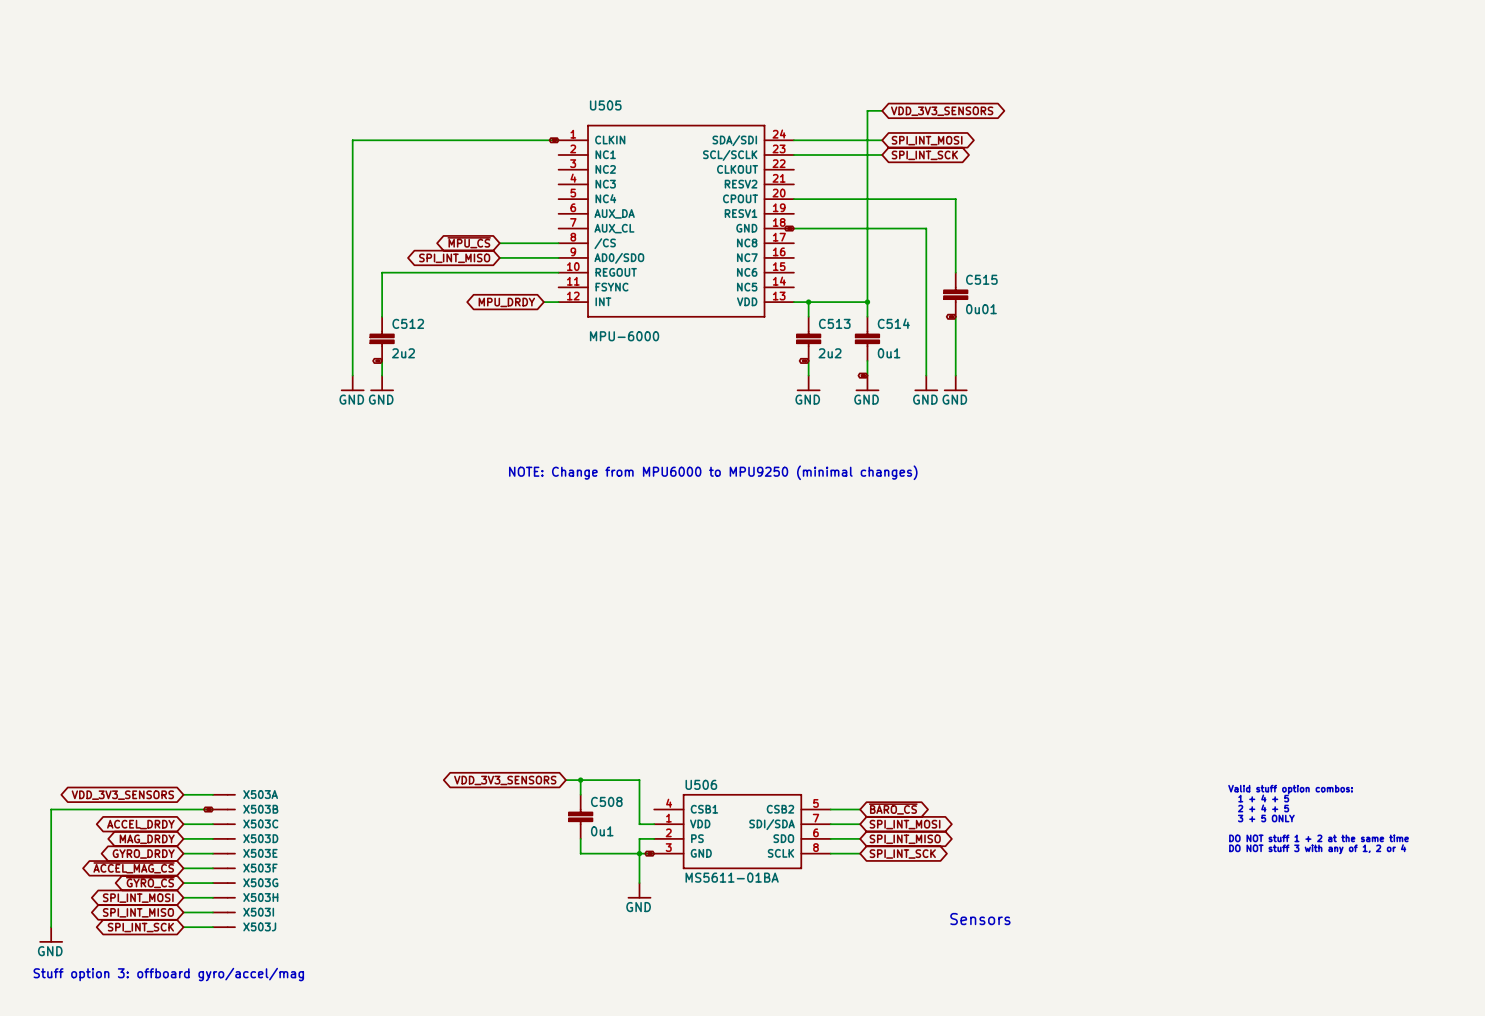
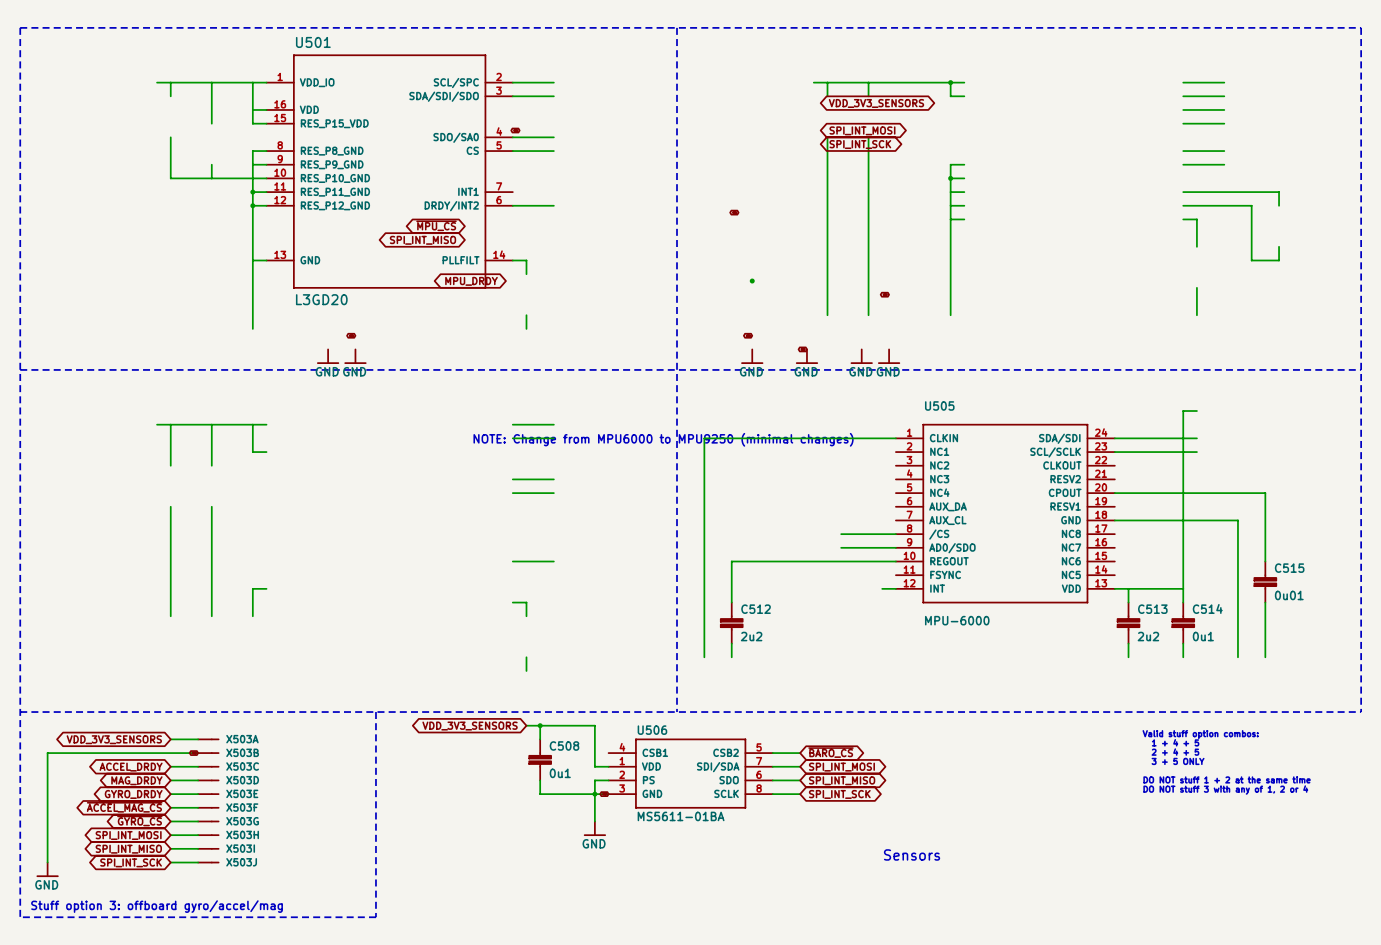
line: none -> (676, 27) (676, 712)
wire: none -> (157, 82) (266, 82)
wire: none -> (170, 82) (170, 96)
wire: none -> (211, 82) (211, 123)
wire: none -> (252, 82) (252, 123) (266, 123)
wire: none -> (512, 82) (553, 82)
wire: none -> (813, 82) (964, 82)
wire: none -> (827, 82) (827, 96)
wire: none -> (868, 82) (868, 96)
wire: none -> (950, 82) (950, 96) (964, 96)
junction: none -> (950, 82)
wire: none -> (1183, 82) (1224, 82)
wire: none -> (512, 96) (553, 96)
wire: none -> (1183, 96) (1224, 96)
wire: (882, 110) (867, 110) (867, 316) -> none
wire: none -> (252, 109) (266, 109)
wire: none -> (1183, 109) (1224, 109)
wire: none -> (1183, 123) (1224, 123)
wire: (558, 140) (352, 140) (352, 375) -> none
wire: (793, 140) (882, 140) -> none
wire: none -> (170, 137) (170, 178) (266, 178)
wire: none -> (512, 137) (553, 137)
wire: none -> (827, 137) (827, 315)
wire: none -> (868, 137) (868, 315)
wire: (793, 155) (882, 155) -> none
wire: none -> (266, 151) (252, 151) (252, 328)
wire: none -> (512, 151) (553, 151)
wire: none -> (1183, 151) (1224, 151)
wire: none -> (211, 164) (211, 178)
wire: none -> (252, 164) (266, 164)
wire: none -> (964, 164) (950, 164) (950, 315)
wire: none -> (1183, 164) (1224, 164)
U501: none -> L3GD20 (389, 171)
wire: none -> (950, 178) (964, 178)
junction: none -> (950, 178)
wire: (793, 199) (955, 199) (955, 272) -> none
wire: none -> (252, 192) (266, 192)
junction: none -> (252, 192)
wire: none -> (950, 192) (964, 192)
wire: none -> (1183, 192) (1279, 192) (1279, 205)
wire: none -> (252, 205) (266, 205)
junction: none -> (252, 205)
wire: none -> (512, 205) (553, 205)
U505 position: (676, 221) -> (1005, 513)
wire: none -> (950, 205) (964, 205)
wire: none -> (1183, 205) (1251, 205) (1251, 260) (1279, 260) (1279, 246)
wire: (793, 228) (926, 228) (926, 375) -> none
wire: none -> (950, 219) (964, 219)
wire: none -> (1183, 219) (1196, 219) (1196, 246)
wire: (499, 243) (558, 243) -> none
wire: (499, 257) (558, 257) -> none
wire: (558, 272) (382, 272) (382, 316) -> none
wire: none -> (252, 260) (266, 260)
wire: none -> (512, 260) (526, 260) (526, 274)
C515 position: (955, 294) -> (1265, 582)
wire: (543, 302) (558, 302) -> none
wire: (793, 302) (867, 302) -> none
wire: (808, 302) (808, 316) -> none
junction: (867, 302) -> none
wire: none -> (1196, 287) (1196, 315)
wire: (955, 316) (955, 375) -> none
C512 position: (382, 338) -> (731, 623)
wire: none -> (526, 315) (526, 328)
C513 position: (808, 338) -> (1128, 623)
C514 position: (867, 338) -> (1183, 623)
wire: (382, 360) (382, 375) -> none
wire: (808, 360) (808, 375) -> none
wire: (867, 360) (867, 375) -> none
line: none -> (20, 369) (1361, 369)
wire: none -> (1196, 411) (1183, 411) (1183, 602)
wire: none -> (157, 424) (266, 424)
wire: none -> (170, 424) (170, 465)
wire: none -> (211, 424) (211, 465)
wire: none -> (252, 424) (252, 452) (266, 452)
wire: none -> (512, 424) (553, 424)
wire: none -> (512, 438) (553, 438)
wire: none -> (895, 438) (704, 438) (704, 657)
wire: none -> (1114, 438) (1196, 438)
wire: none -> (1114, 452) (1196, 452)
wire: none -> (512, 479) (553, 479)
wire: none -> (512, 493) (553, 493)
wire: none -> (1114, 493) (1265, 493) (1265, 561)
wire: none -> (170, 506) (170, 616)
wire: none -> (211, 506) (211, 616)
wire: none -> (1114, 520) (1237, 520) (1237, 657)
wire: none -> (841, 534) (895, 534)
wire: none -> (841, 547) (895, 547)
wire: none -> (512, 561) (553, 561)
wire: none -> (895, 561) (731, 561) (731, 602)
wire: none -> (266, 588) (252, 588) (252, 616)
wire: none -> (882, 588) (895, 588)
wire: none -> (1114, 588) (1183, 588)
wire: none -> (1128, 588) (1128, 602)
wire: none -> (512, 602) (526, 602) (526, 616)
wire: none -> (1265, 602) (1265, 657)
wire: none -> (731, 643) (731, 657)
wire: none -> (1128, 643) (1128, 657)
wire: none -> (1183, 643) (1183, 657)
wire: none -> (526, 657) (526, 670)
line: none -> (20, 712) (1361, 712) (1361, 27) (20, 27) (20, 917) (375, 917) (375, 712)

